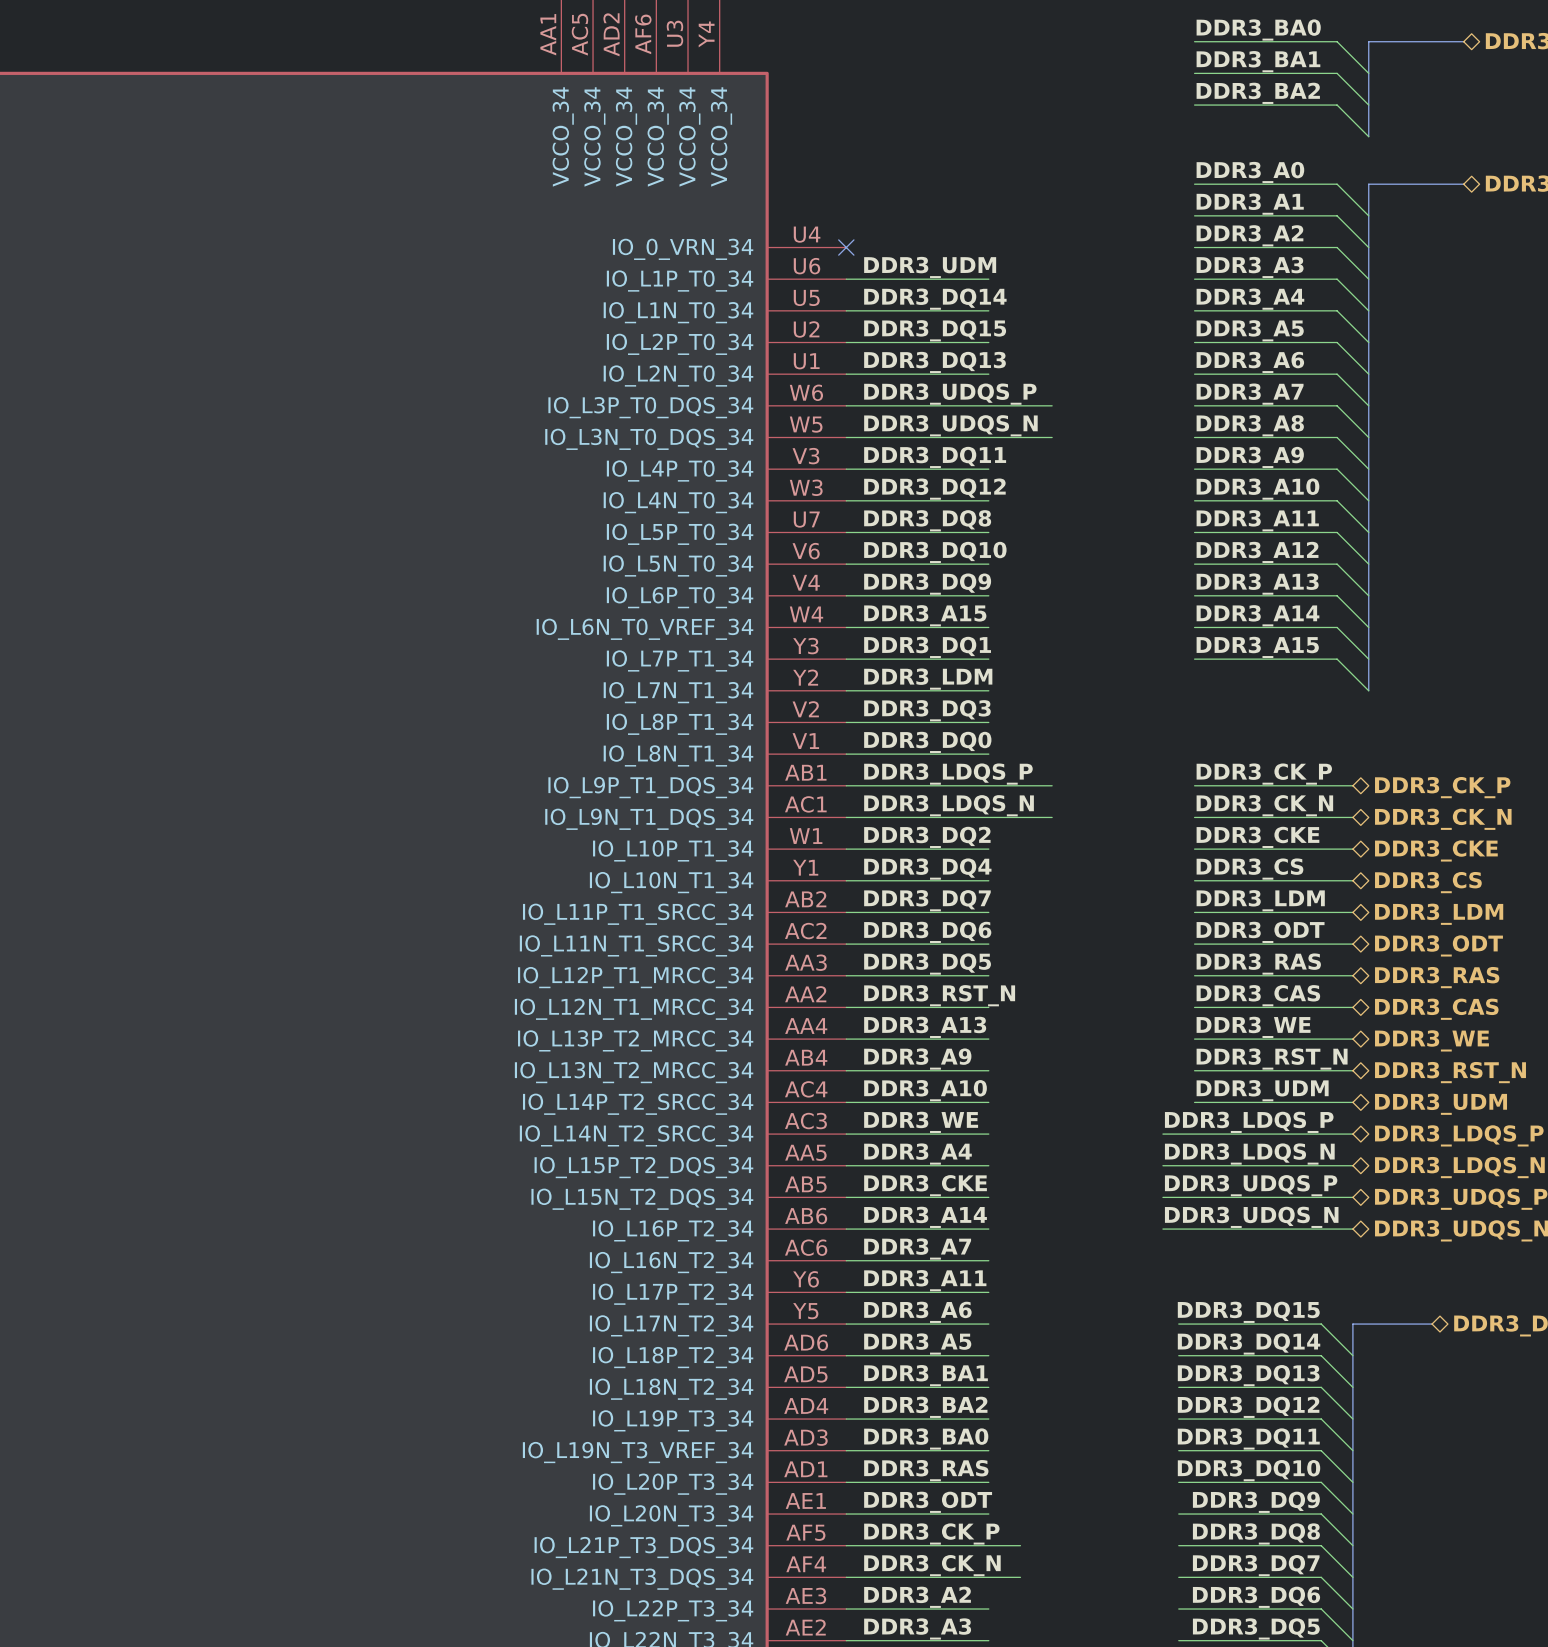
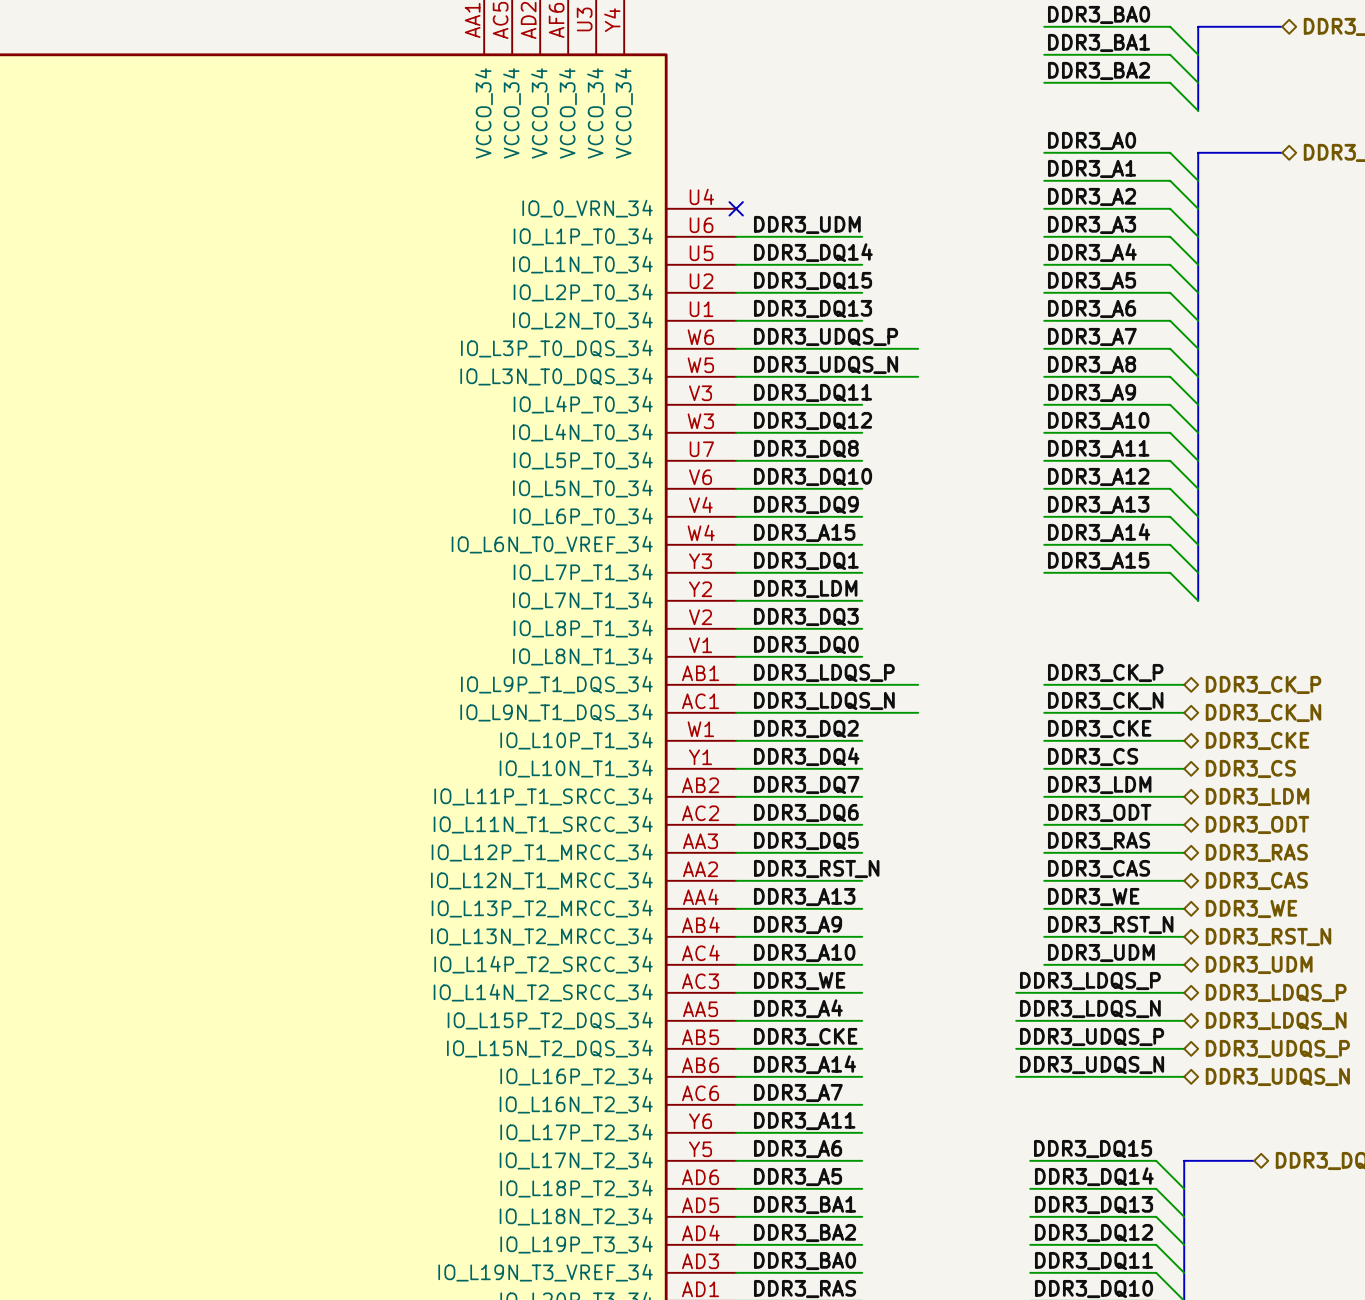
label position: DDR3_DQ15 (1248, 1312) -> DDR3_DQ15 (1093, 1149)

